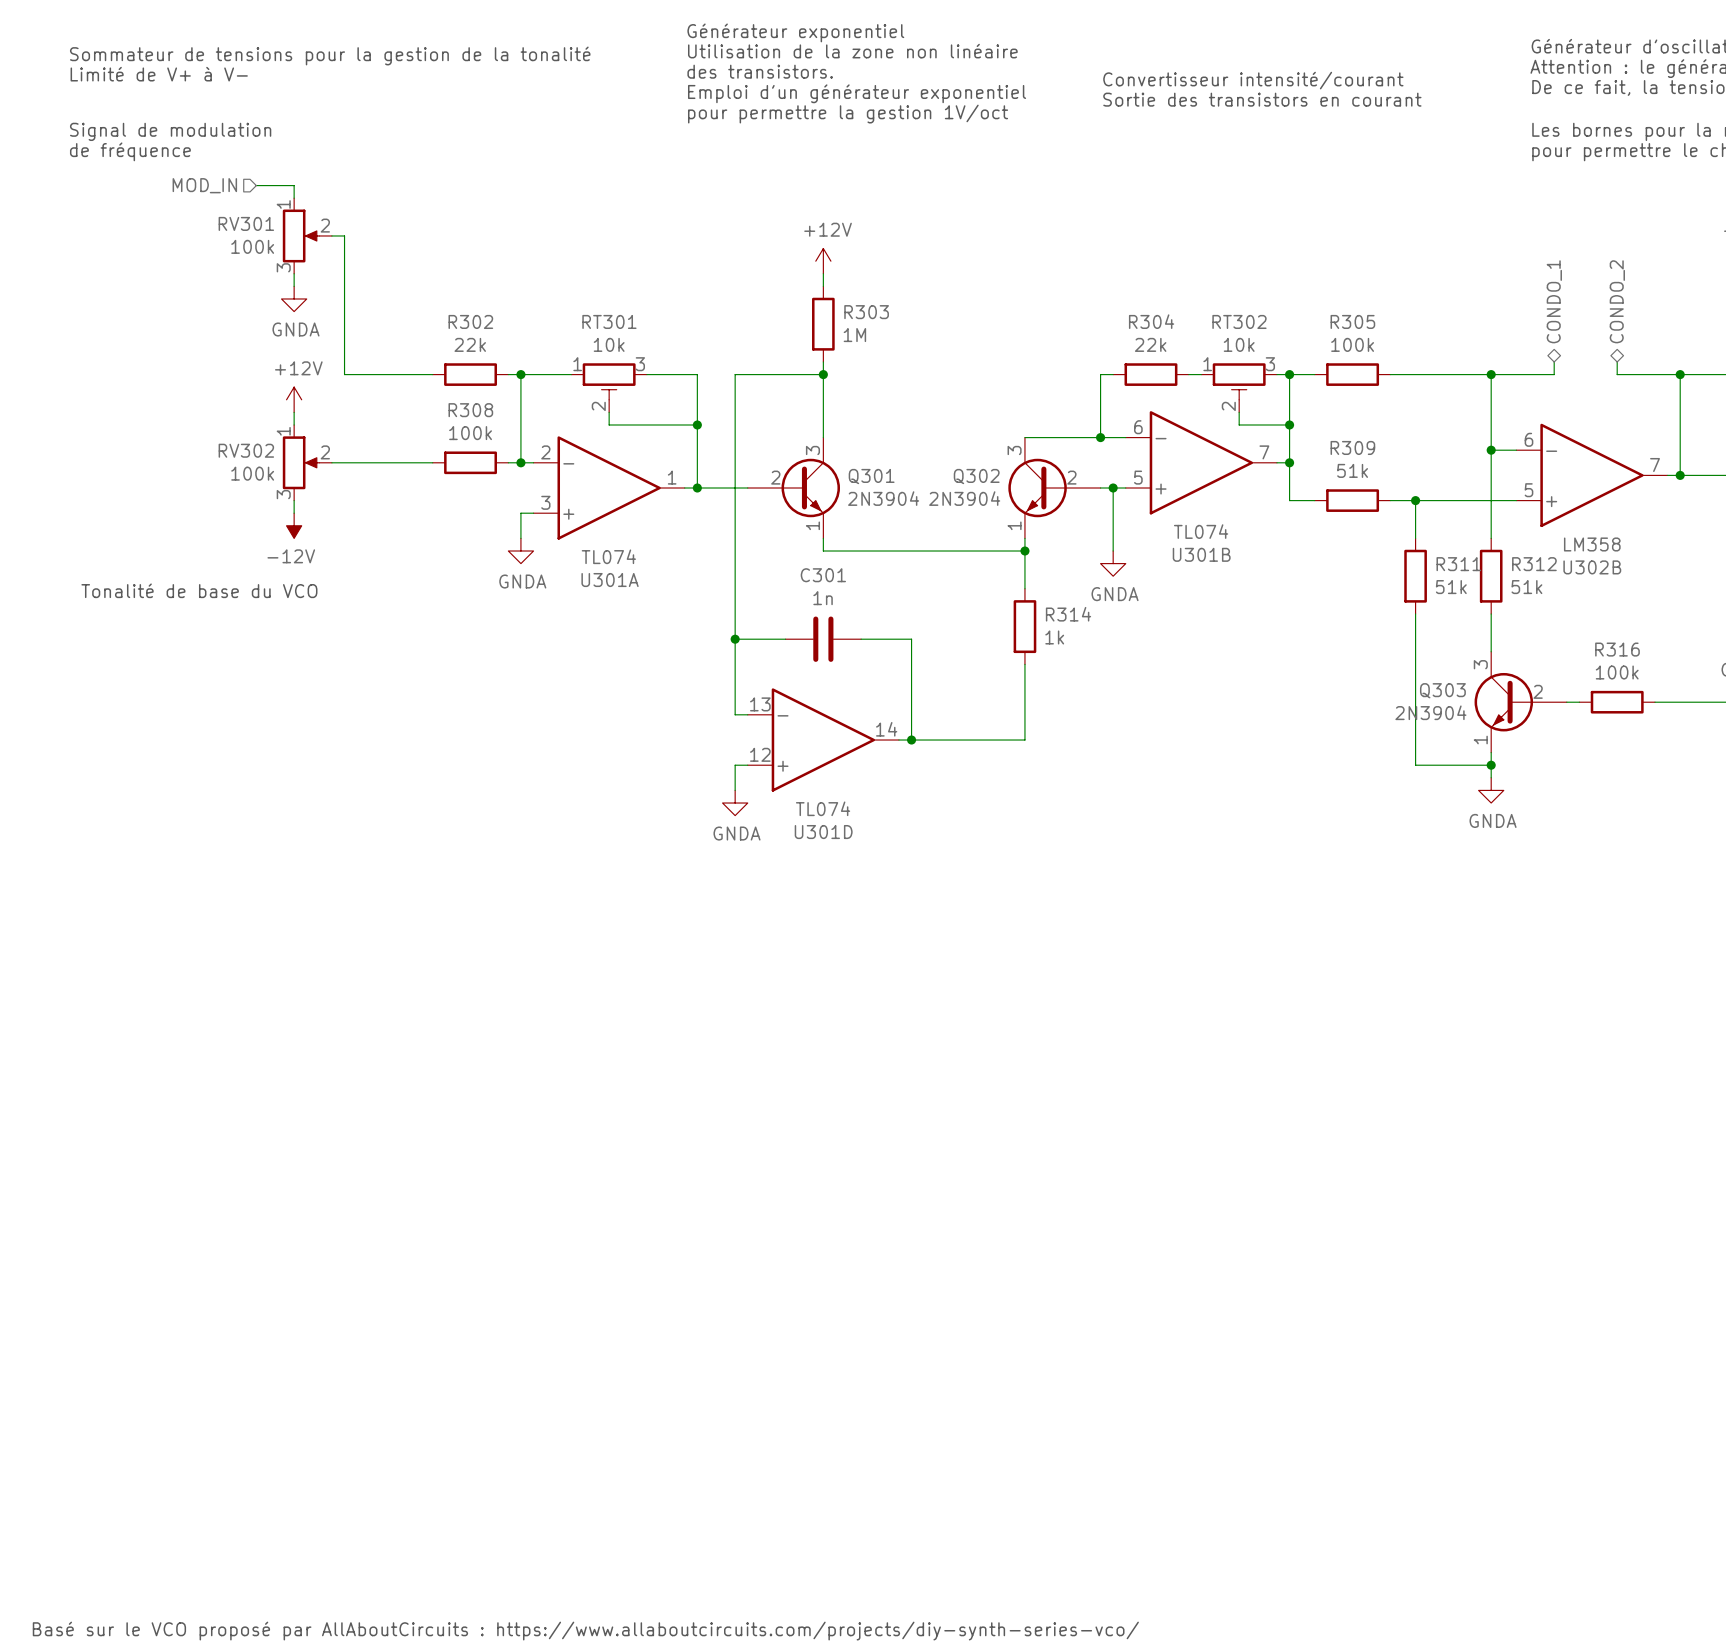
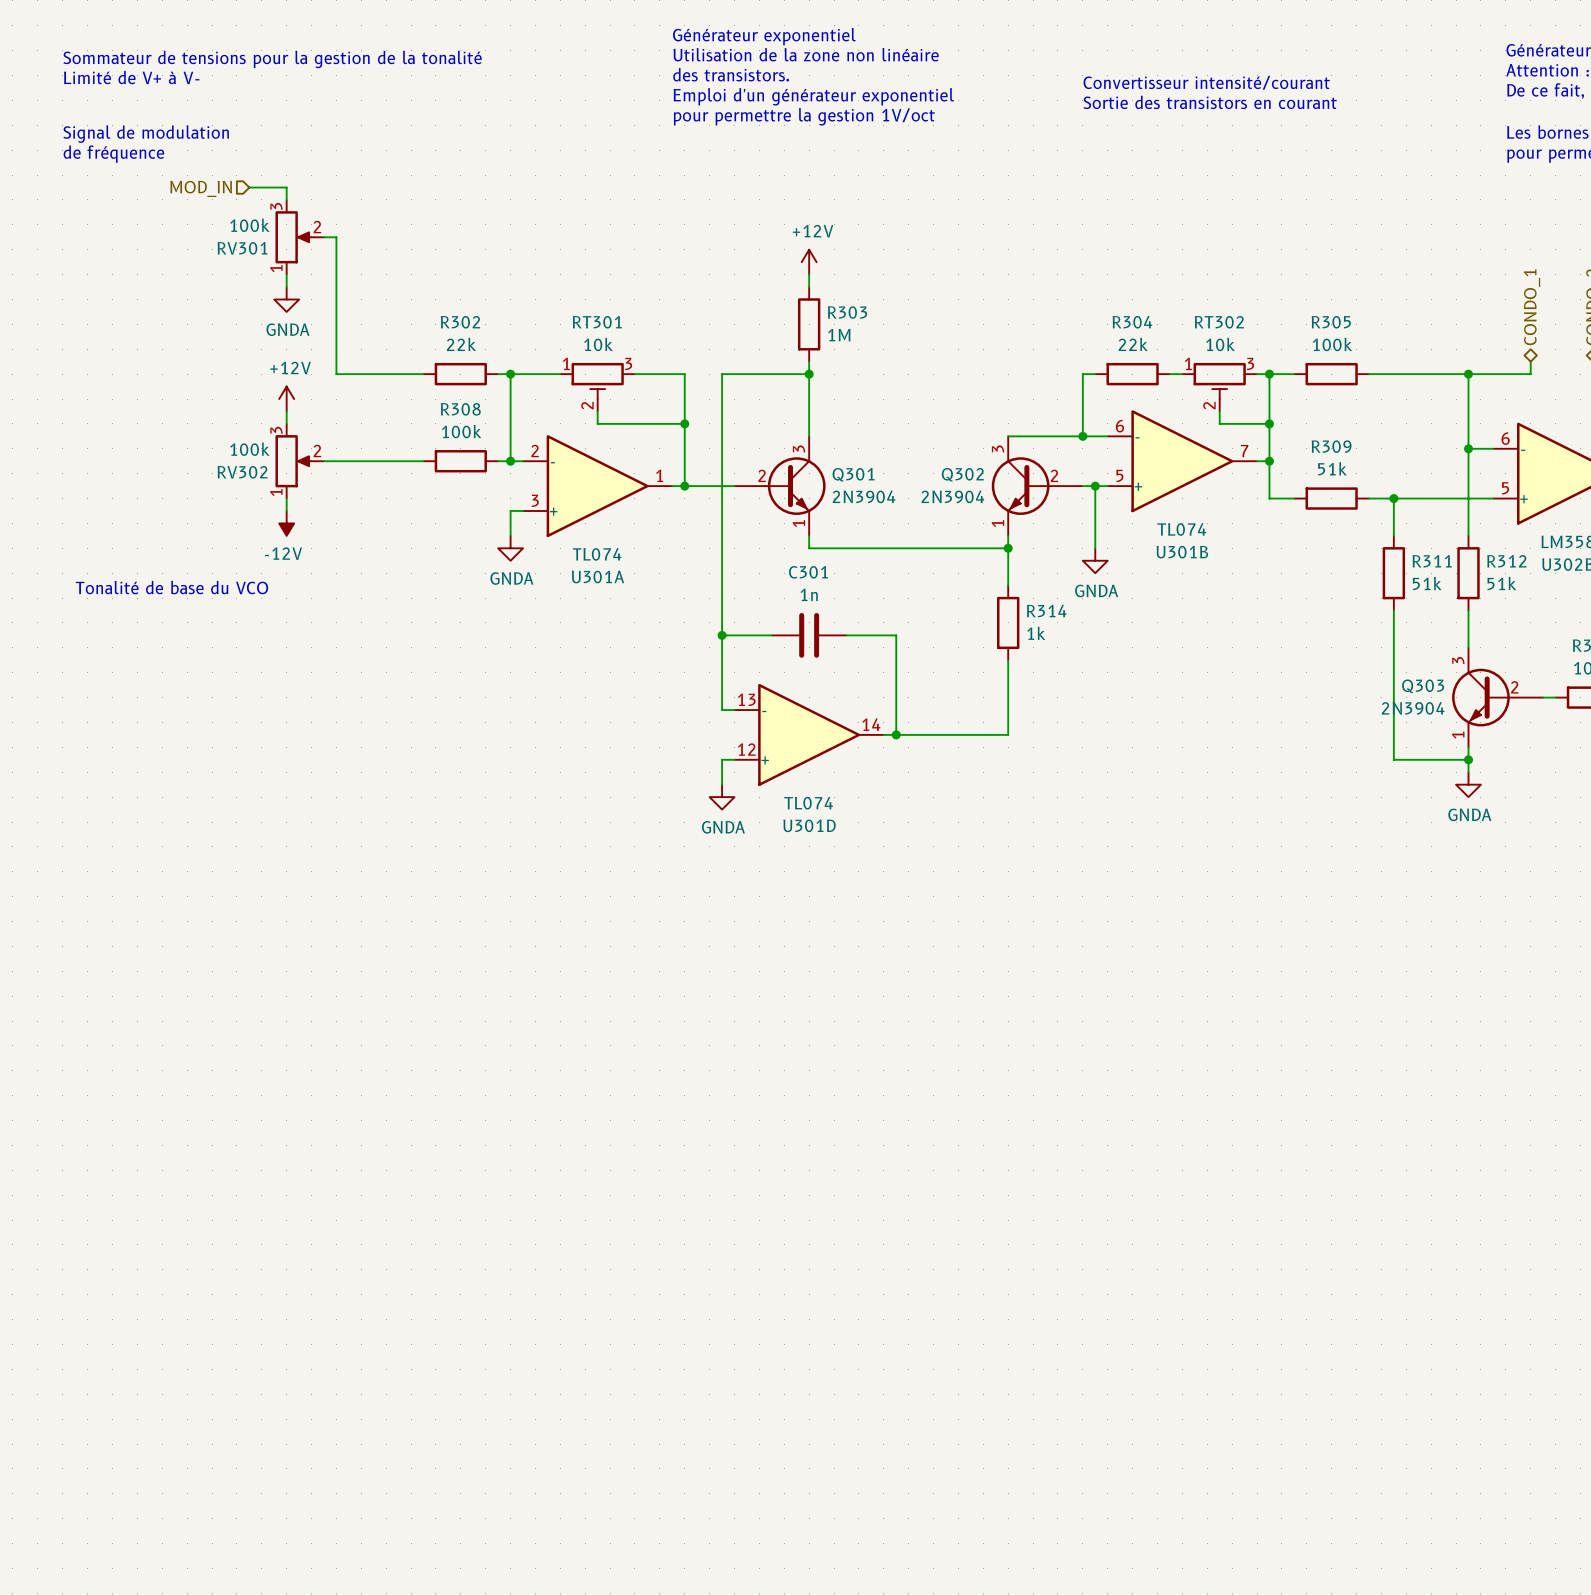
RV301 flip: as is (301, 235) -> up-down (293, 237)
RV302 flip: as is (301, 462) -> up-down (293, 461)

